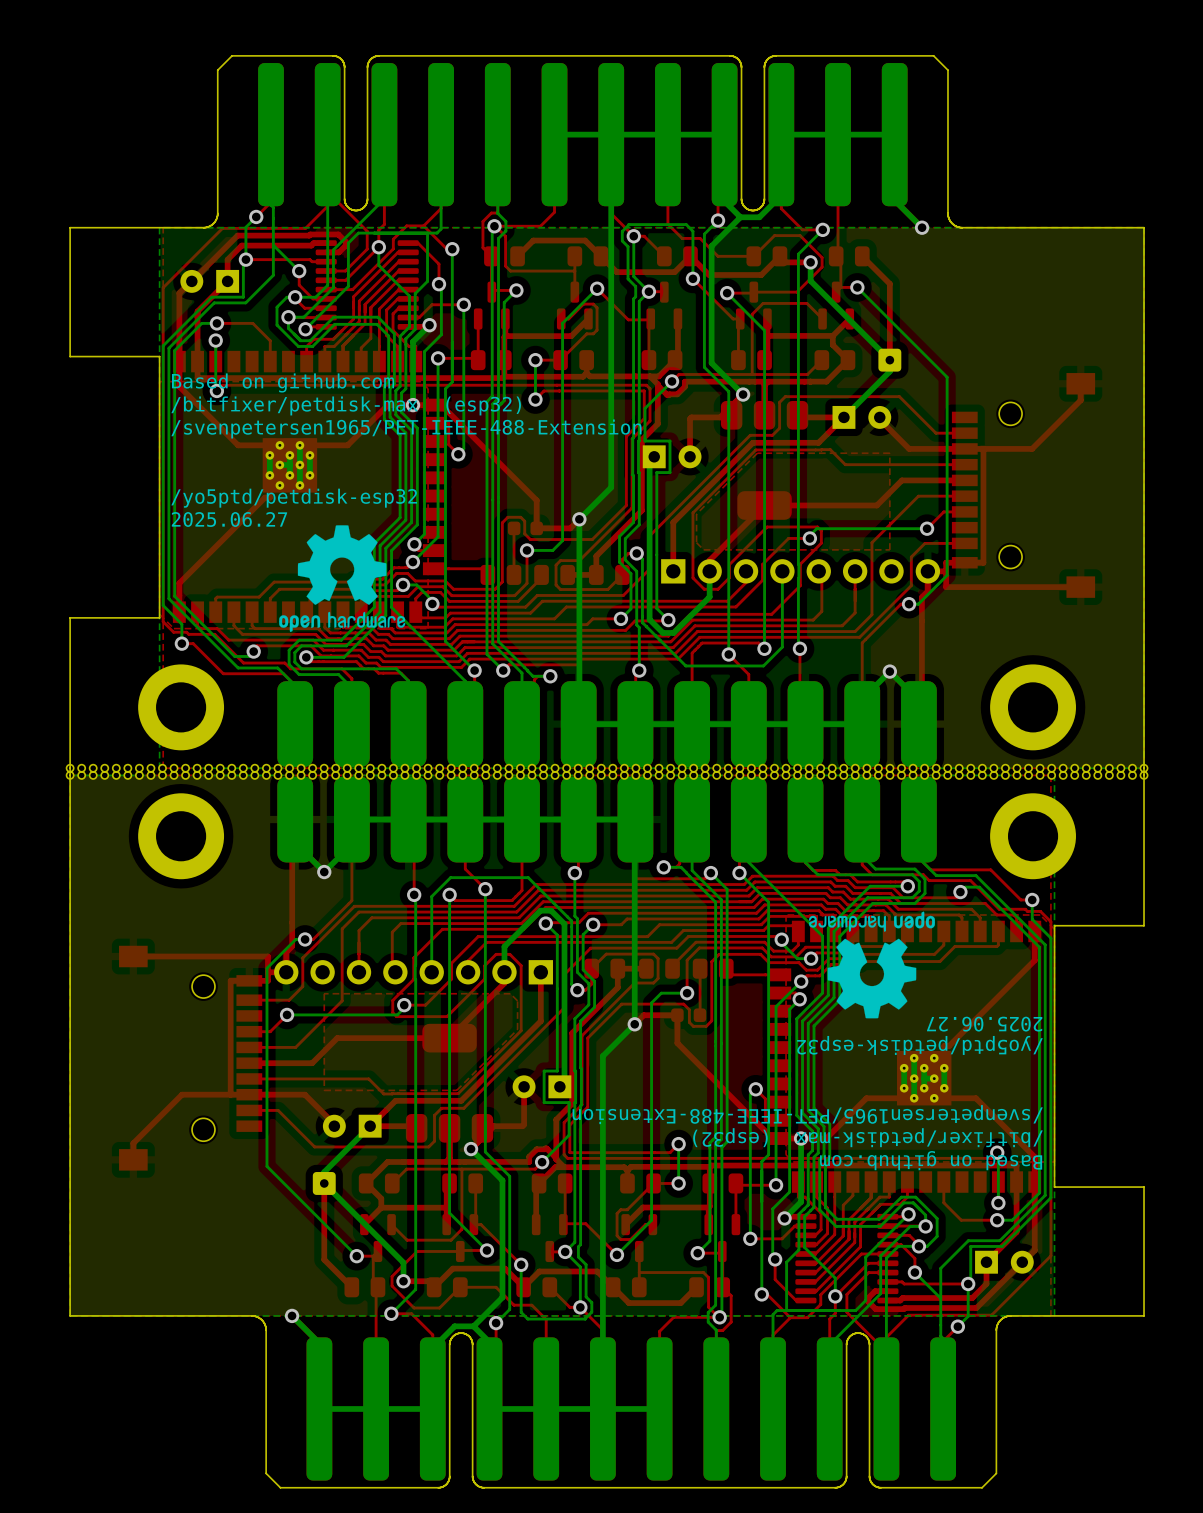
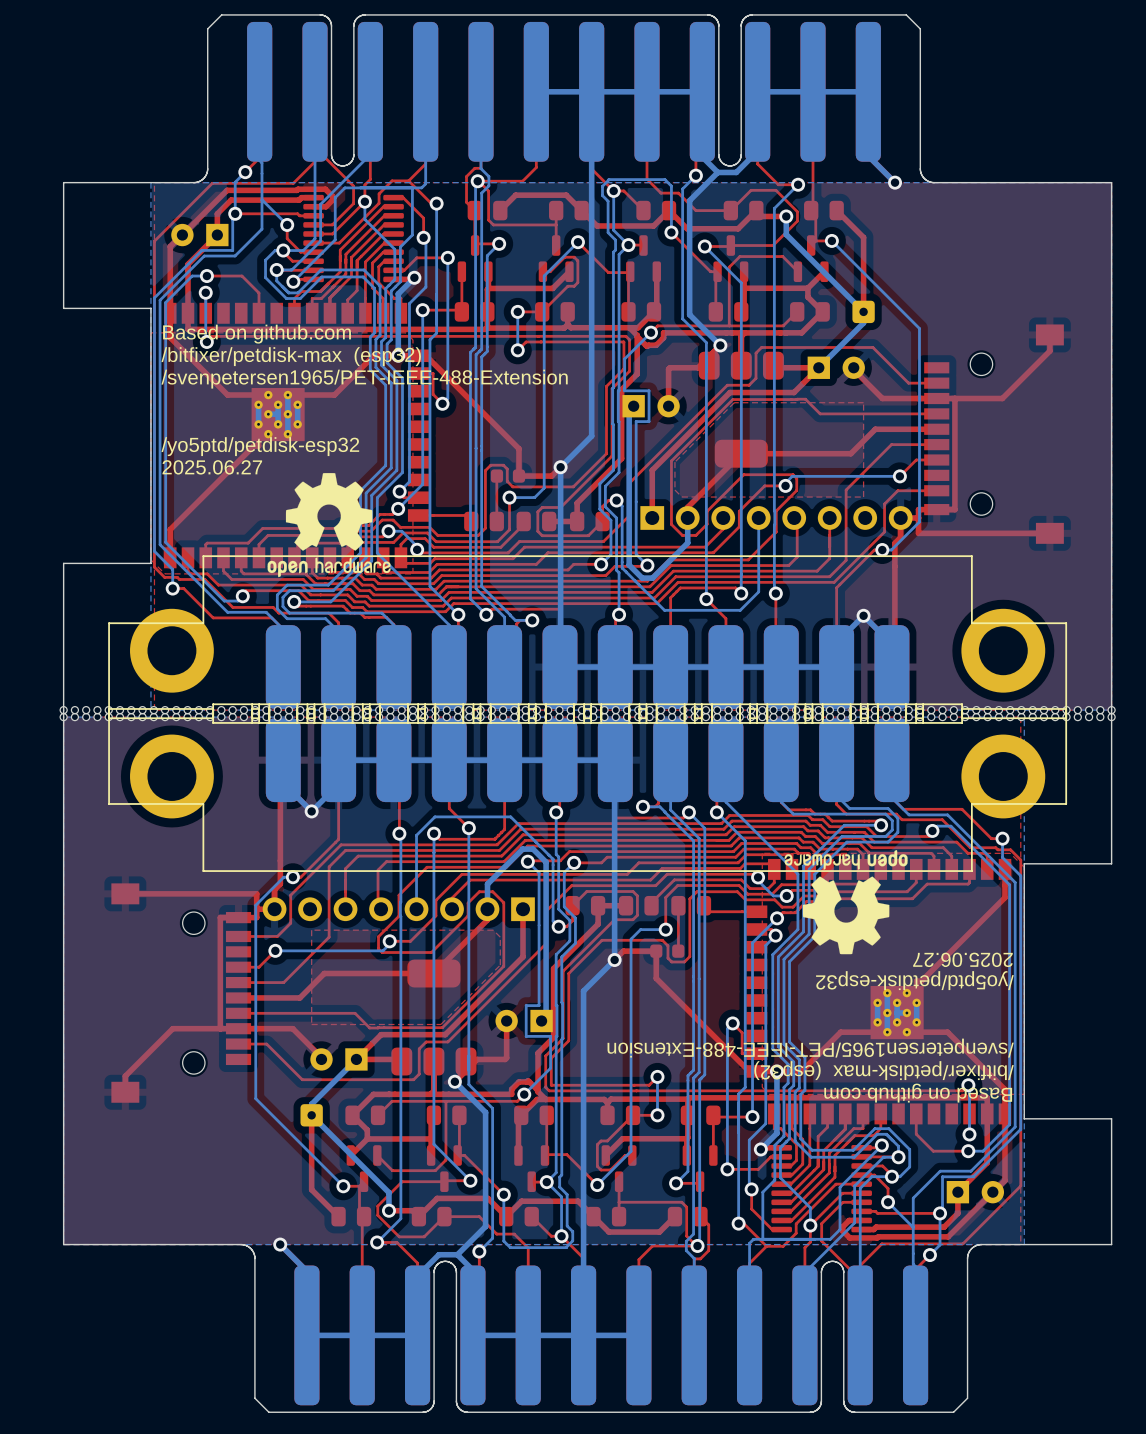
part footprint: [277, 681, 937, 768] -> [108, 555, 1068, 803]
part footprint: [277, 776, 937, 863] -> [108, 625, 1068, 872]

